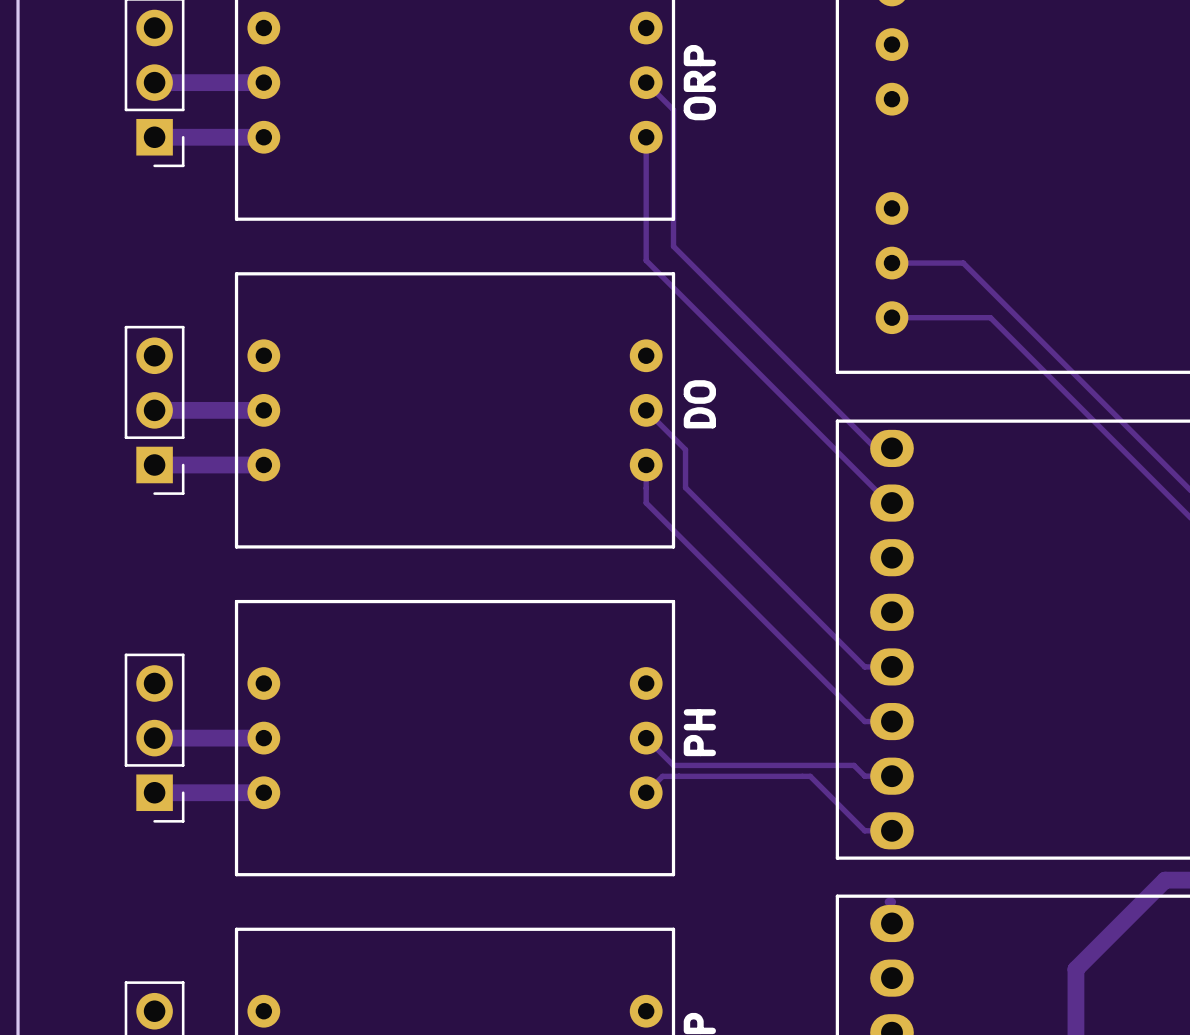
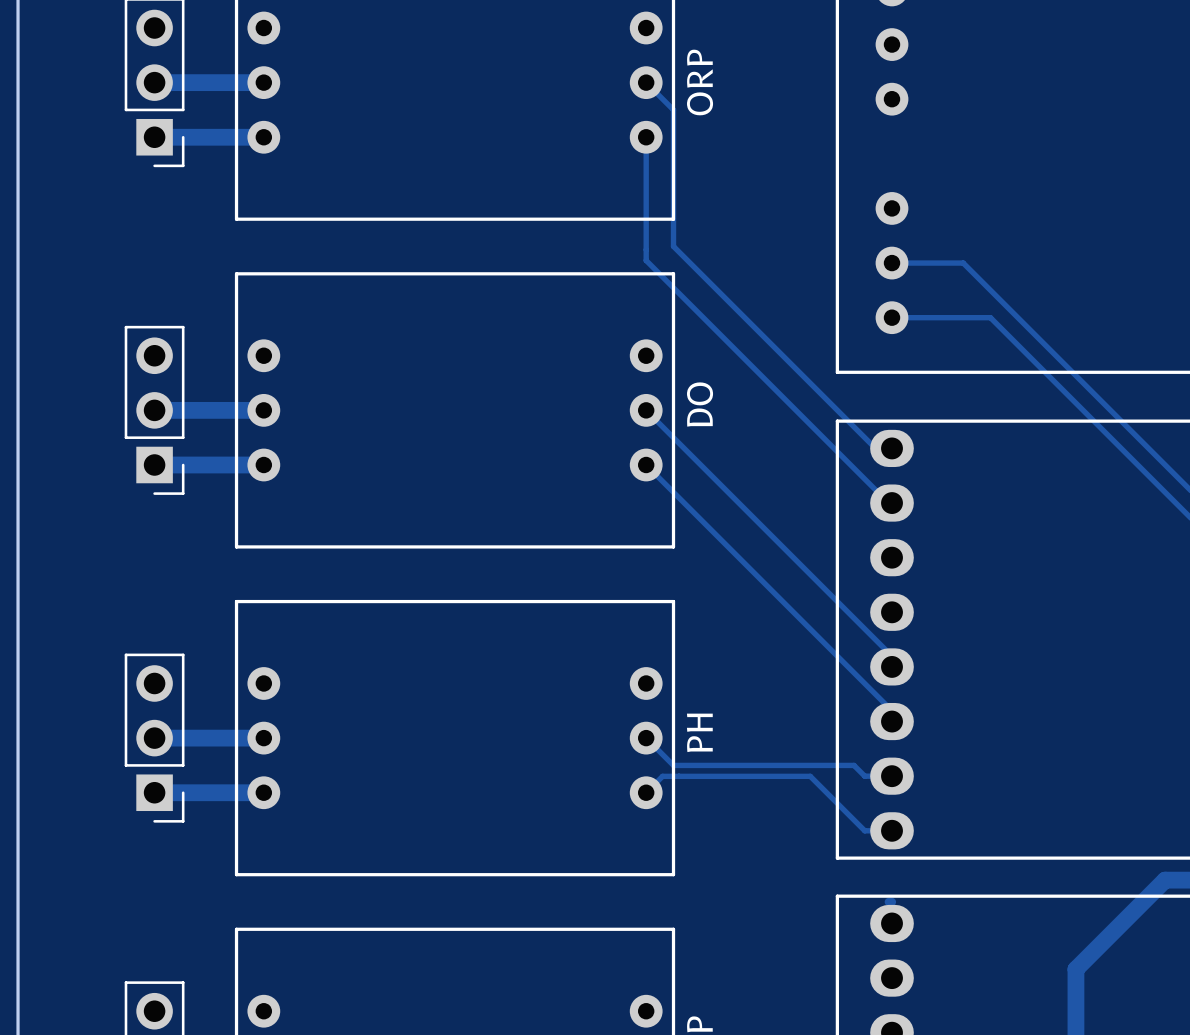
track: (685, 449) (685, 487) (864, 666) (892, 666) -> (685, 449) (892, 656)
track: (646, 464) (646, 502) (864, 721) (892, 721) -> (646, 464) (892, 710)

